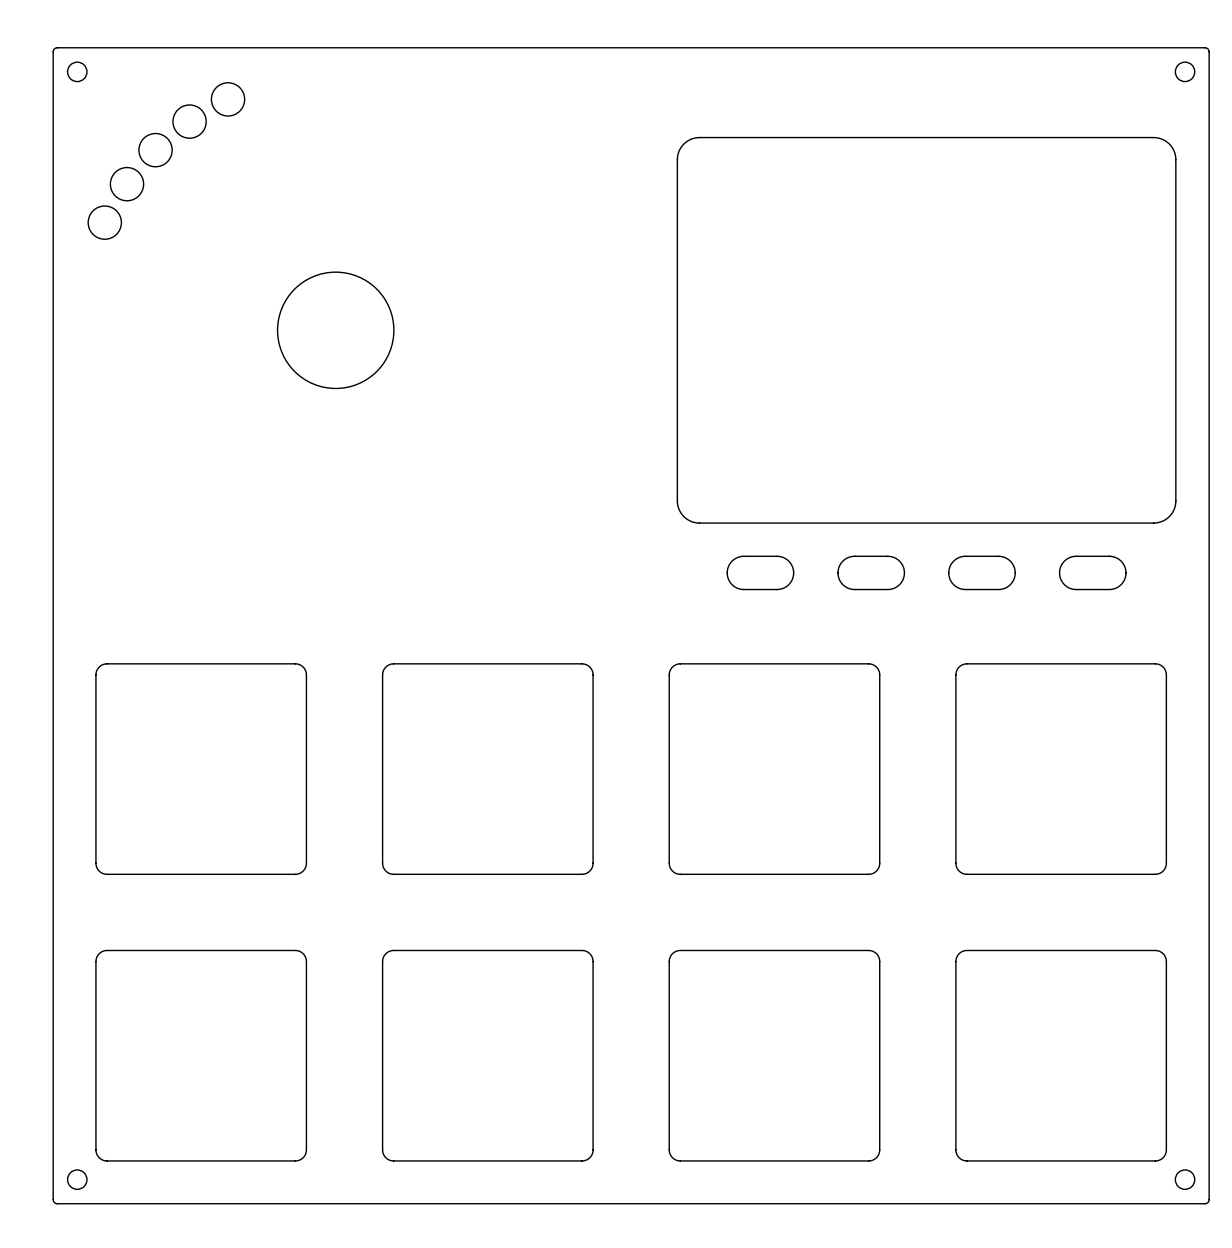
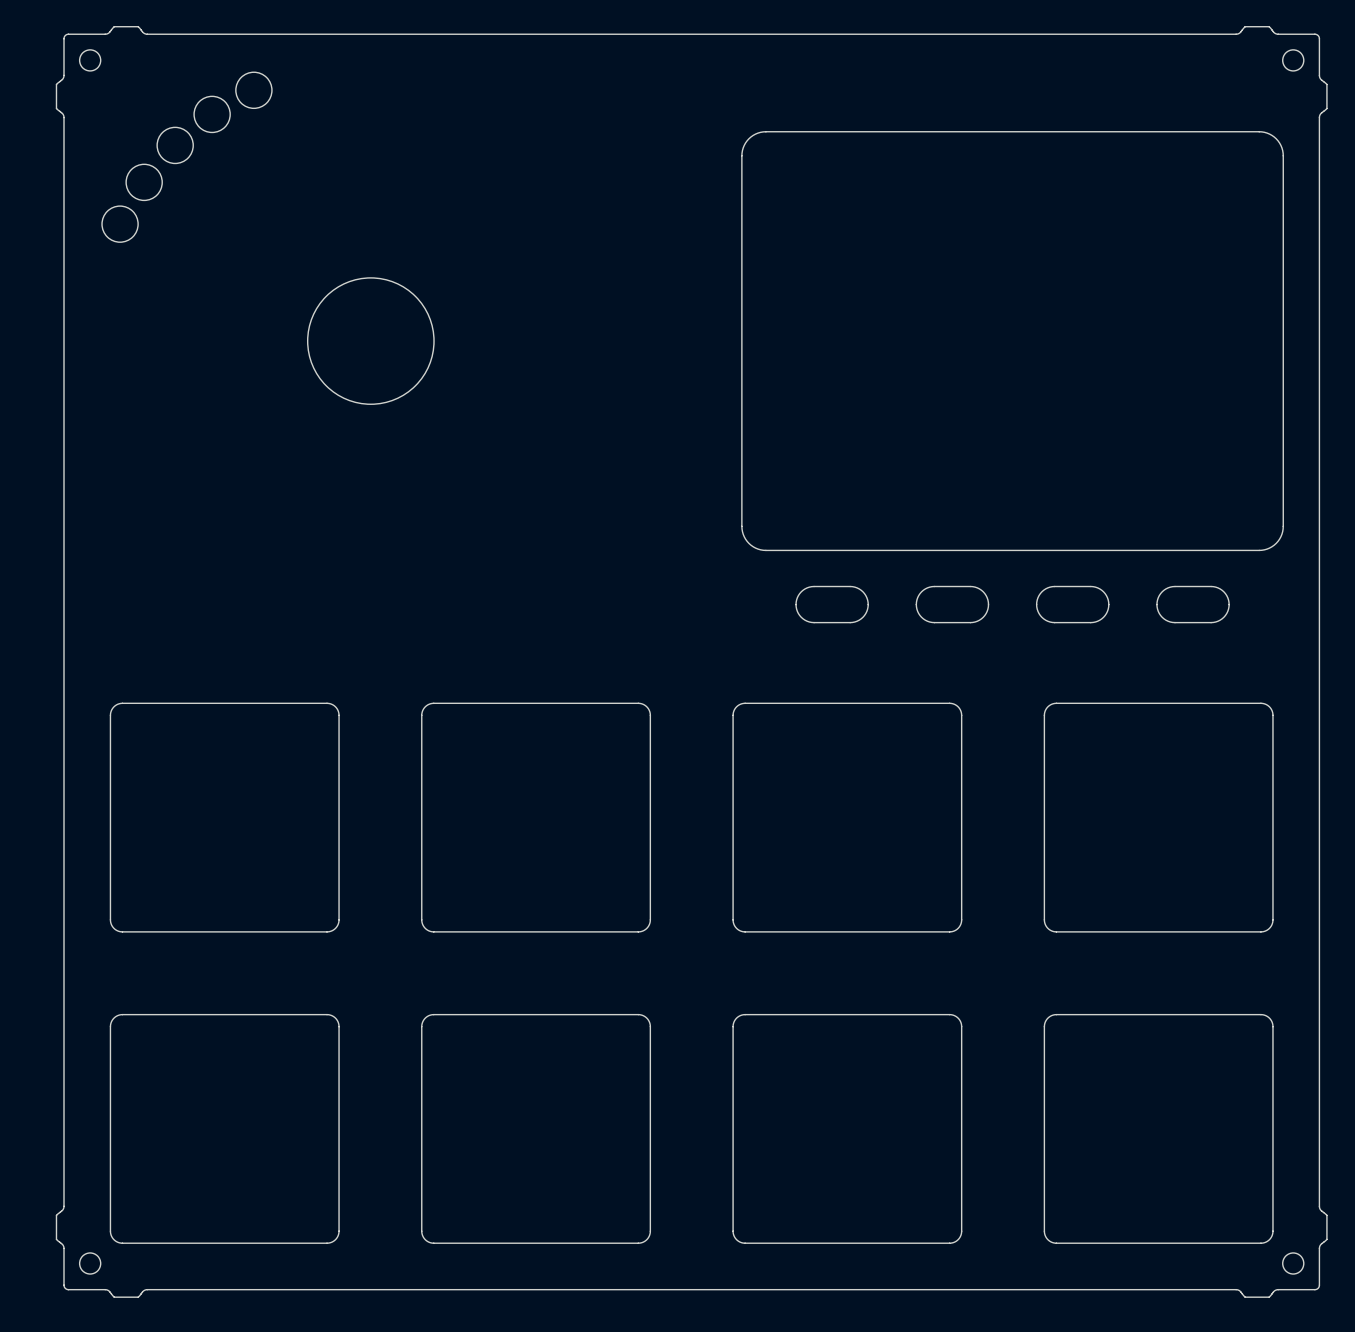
drawing shape: [52, 47, 1210, 1205] -> [56, 26, 1328, 1298]

